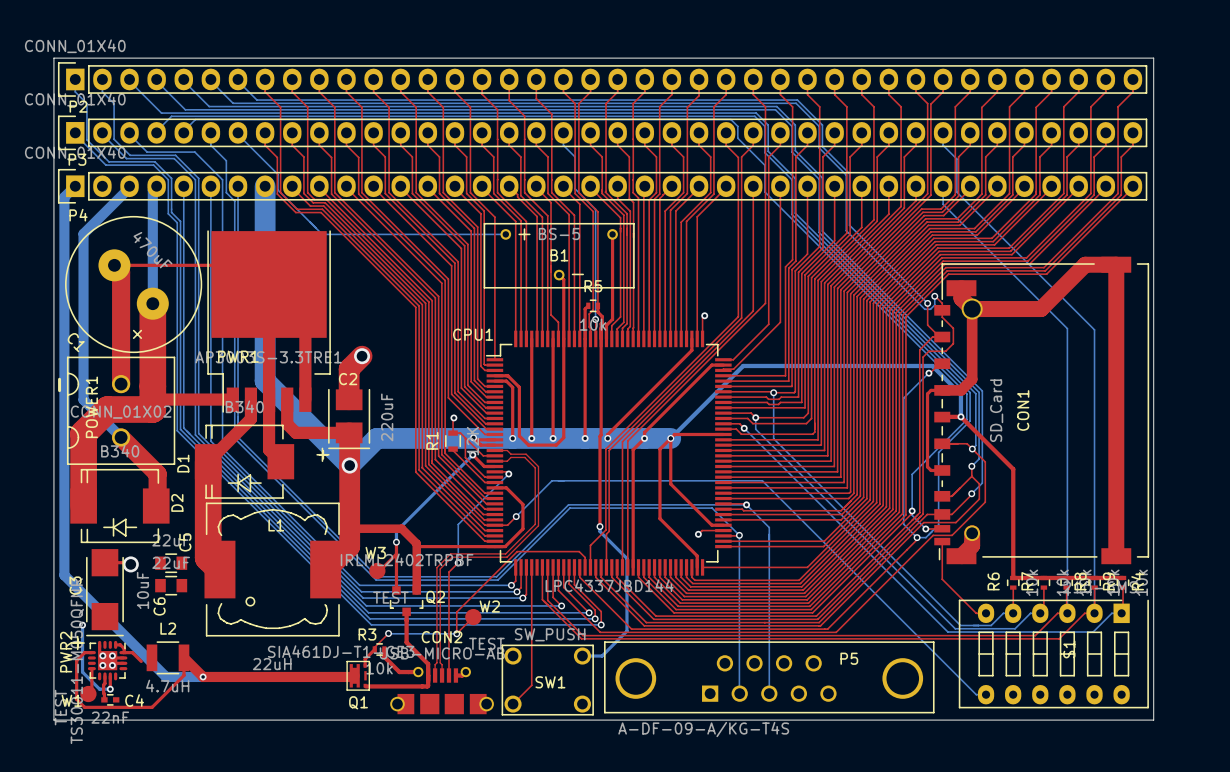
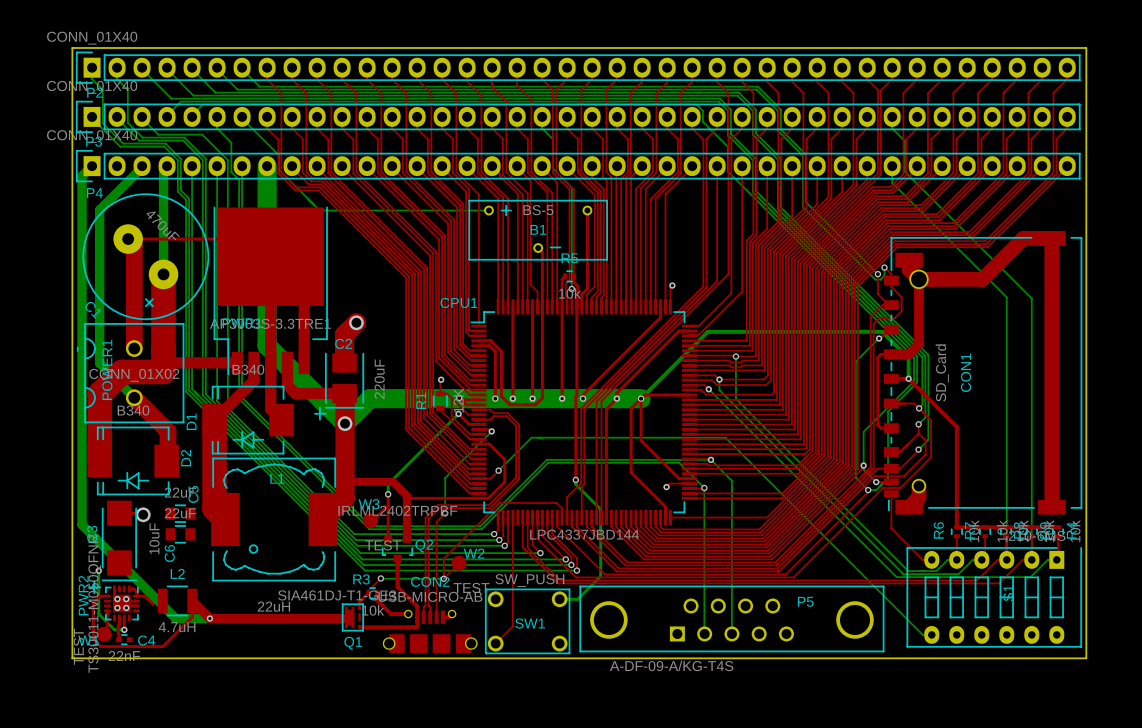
CON2 footprint: [390, 666, 494, 715] -> [382, 609, 478, 653]

